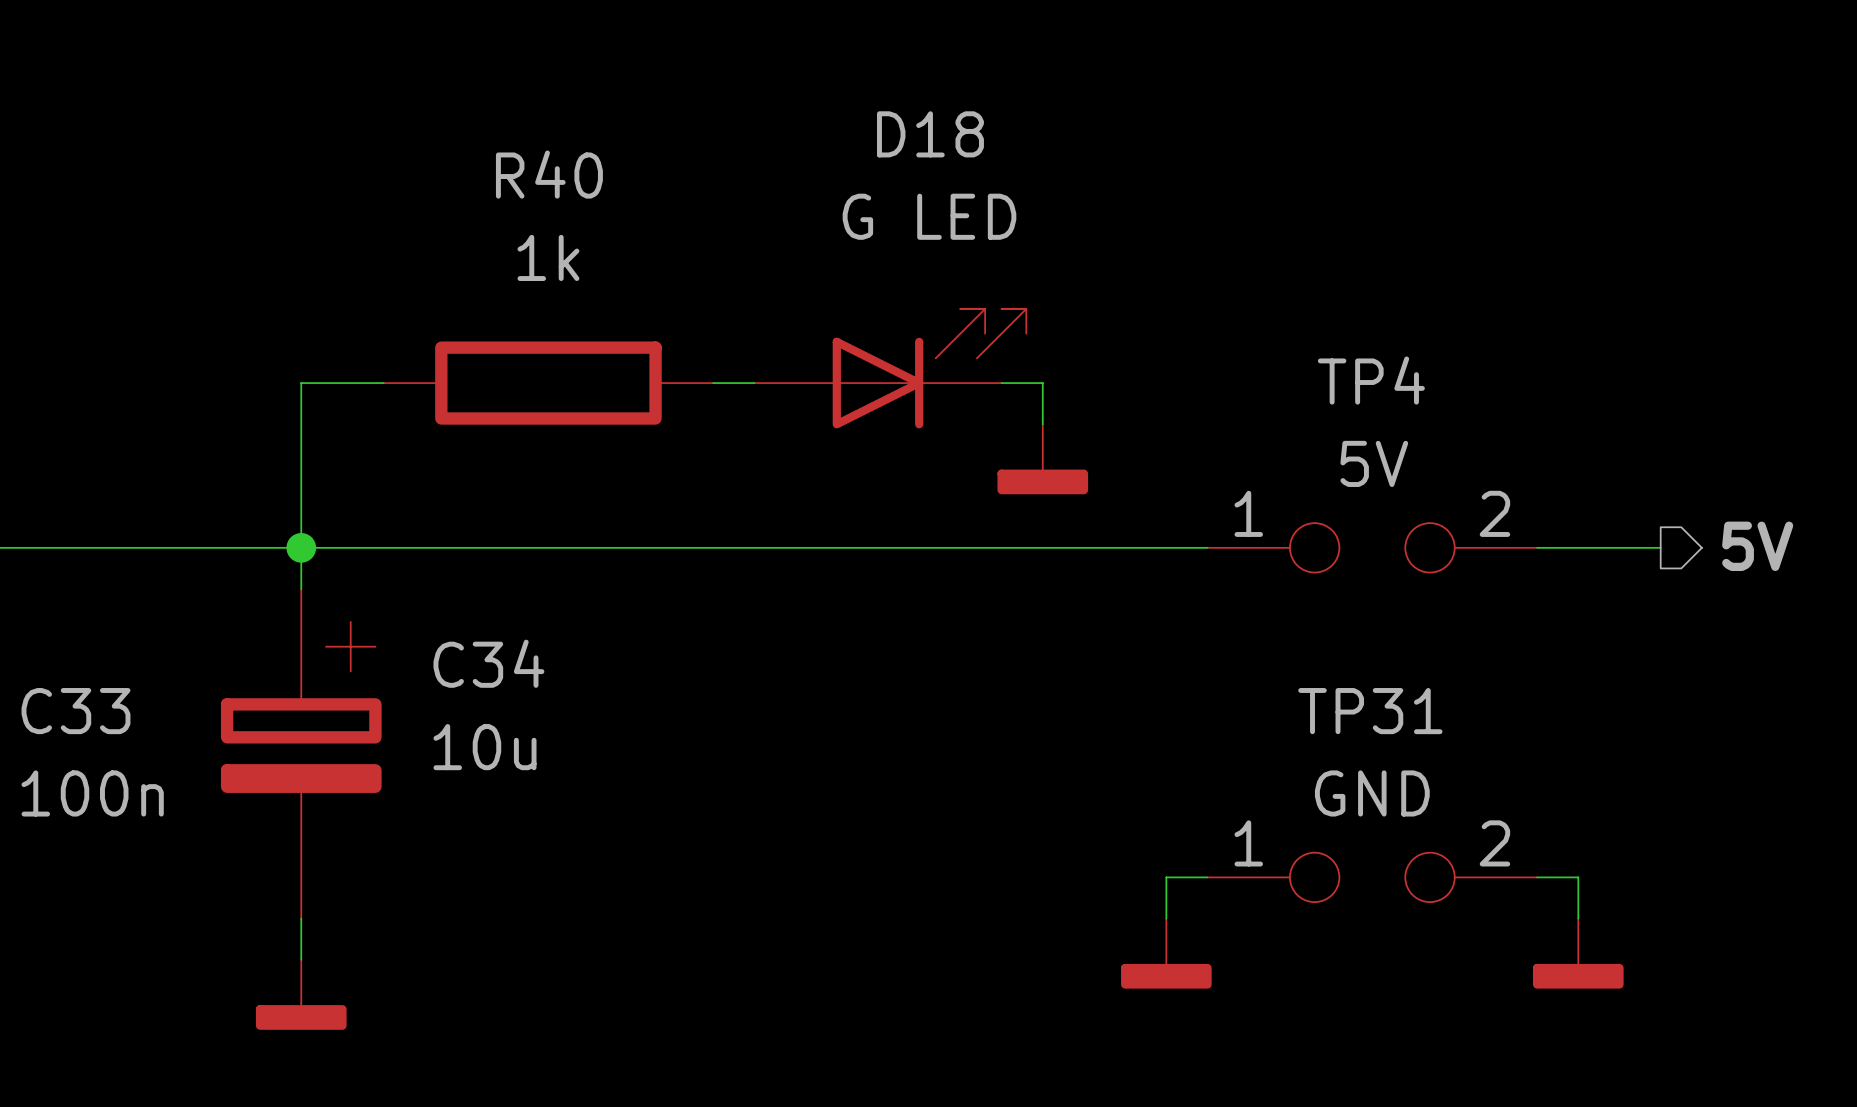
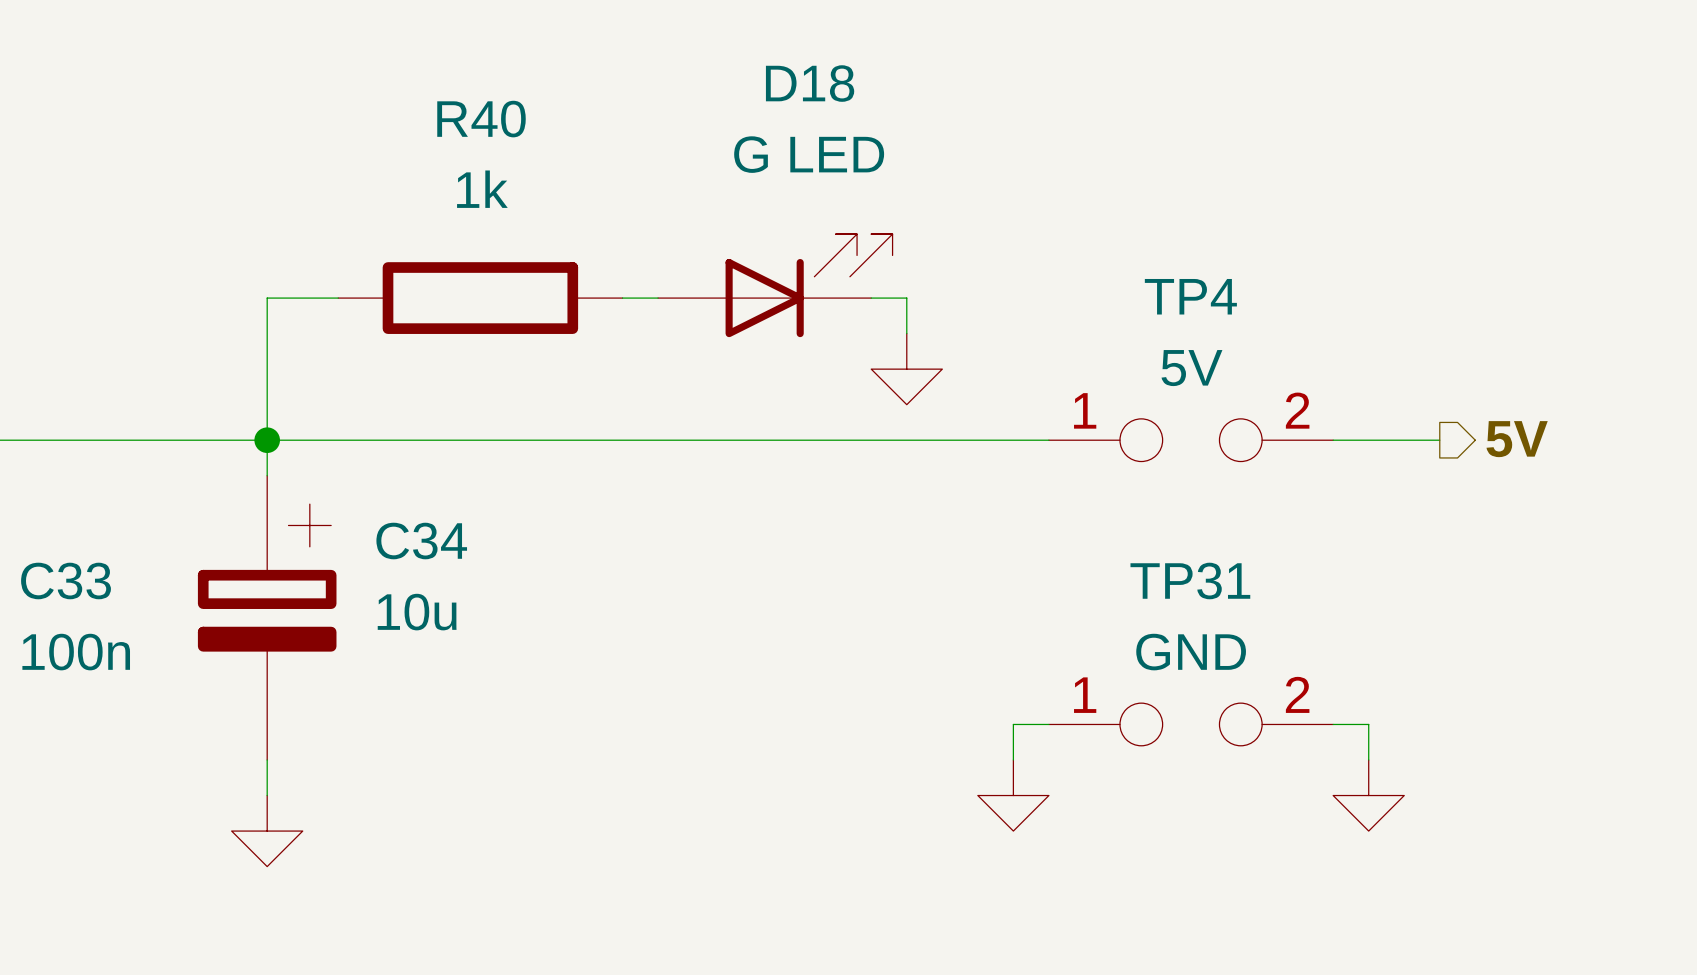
power symbol shape: [997, 424, 1089, 495] -> [871, 333, 943, 405]
power symbol shape: [1121, 918, 1212, 989] -> [977, 760, 1049, 832]
power symbol shape: [1532, 918, 1624, 989] -> [1333, 760, 1405, 832]
power symbol shape: [255, 959, 347, 1030] -> [231, 795, 303, 867]

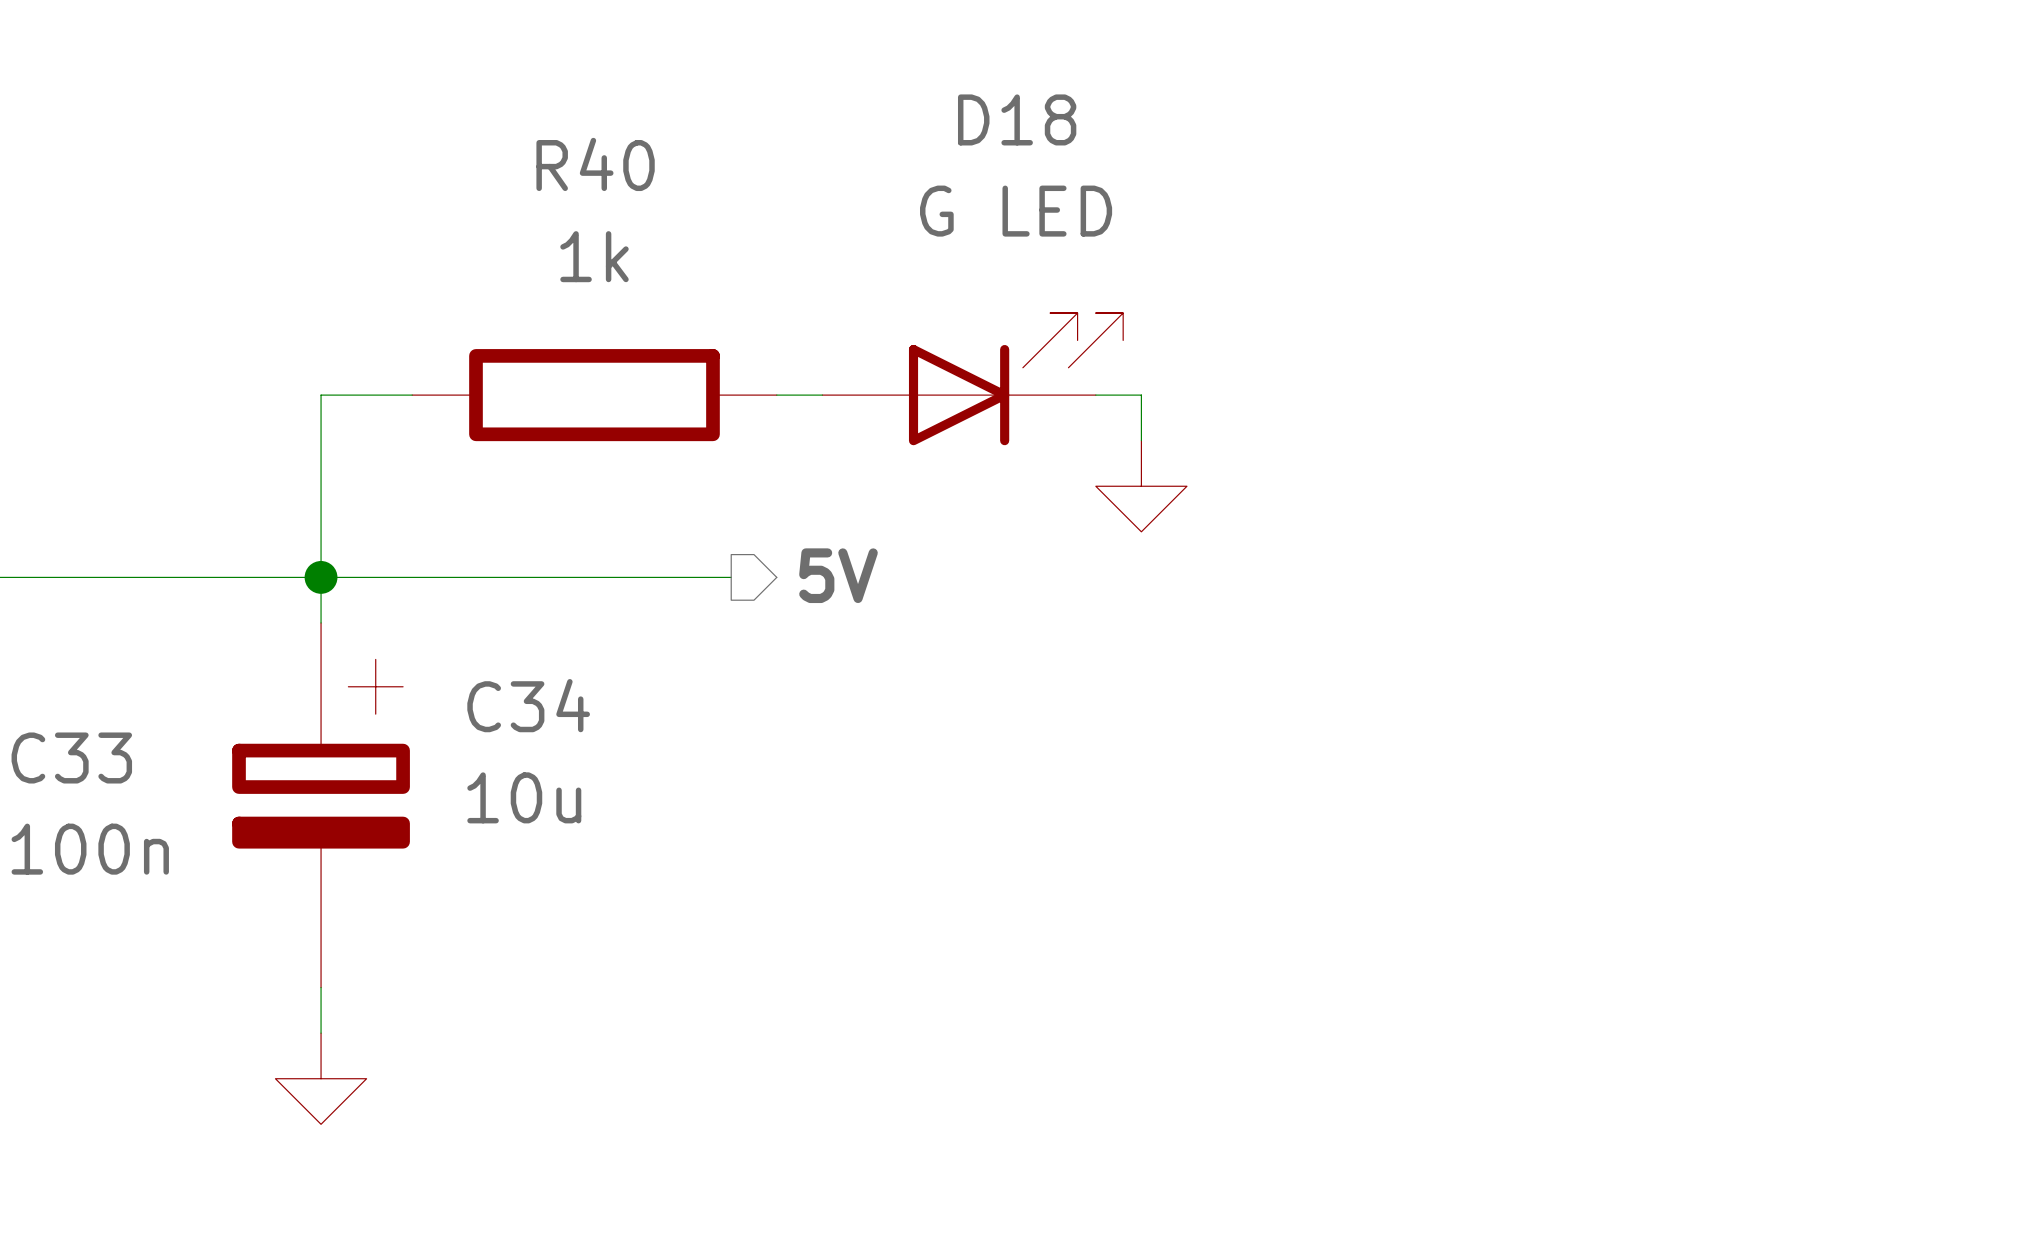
hierarchical label: none -> 5V (838, 575)
hierarchical label: 5V (1517, 439) -> none
wire: (586, 440) (1048, 440) -> none
TP4: 5V (1191, 440) -> none
wire: (1333, 440) (1439, 440) -> none
wire: (1048, 724) (1013, 724) (1013, 760) -> none
TP31: GND (1191, 724) -> none
wire: (1333, 724) (1368, 724) (1368, 760) -> none
power symbol: (1013, 795) -> none
power symbol: (1368, 795) -> none

